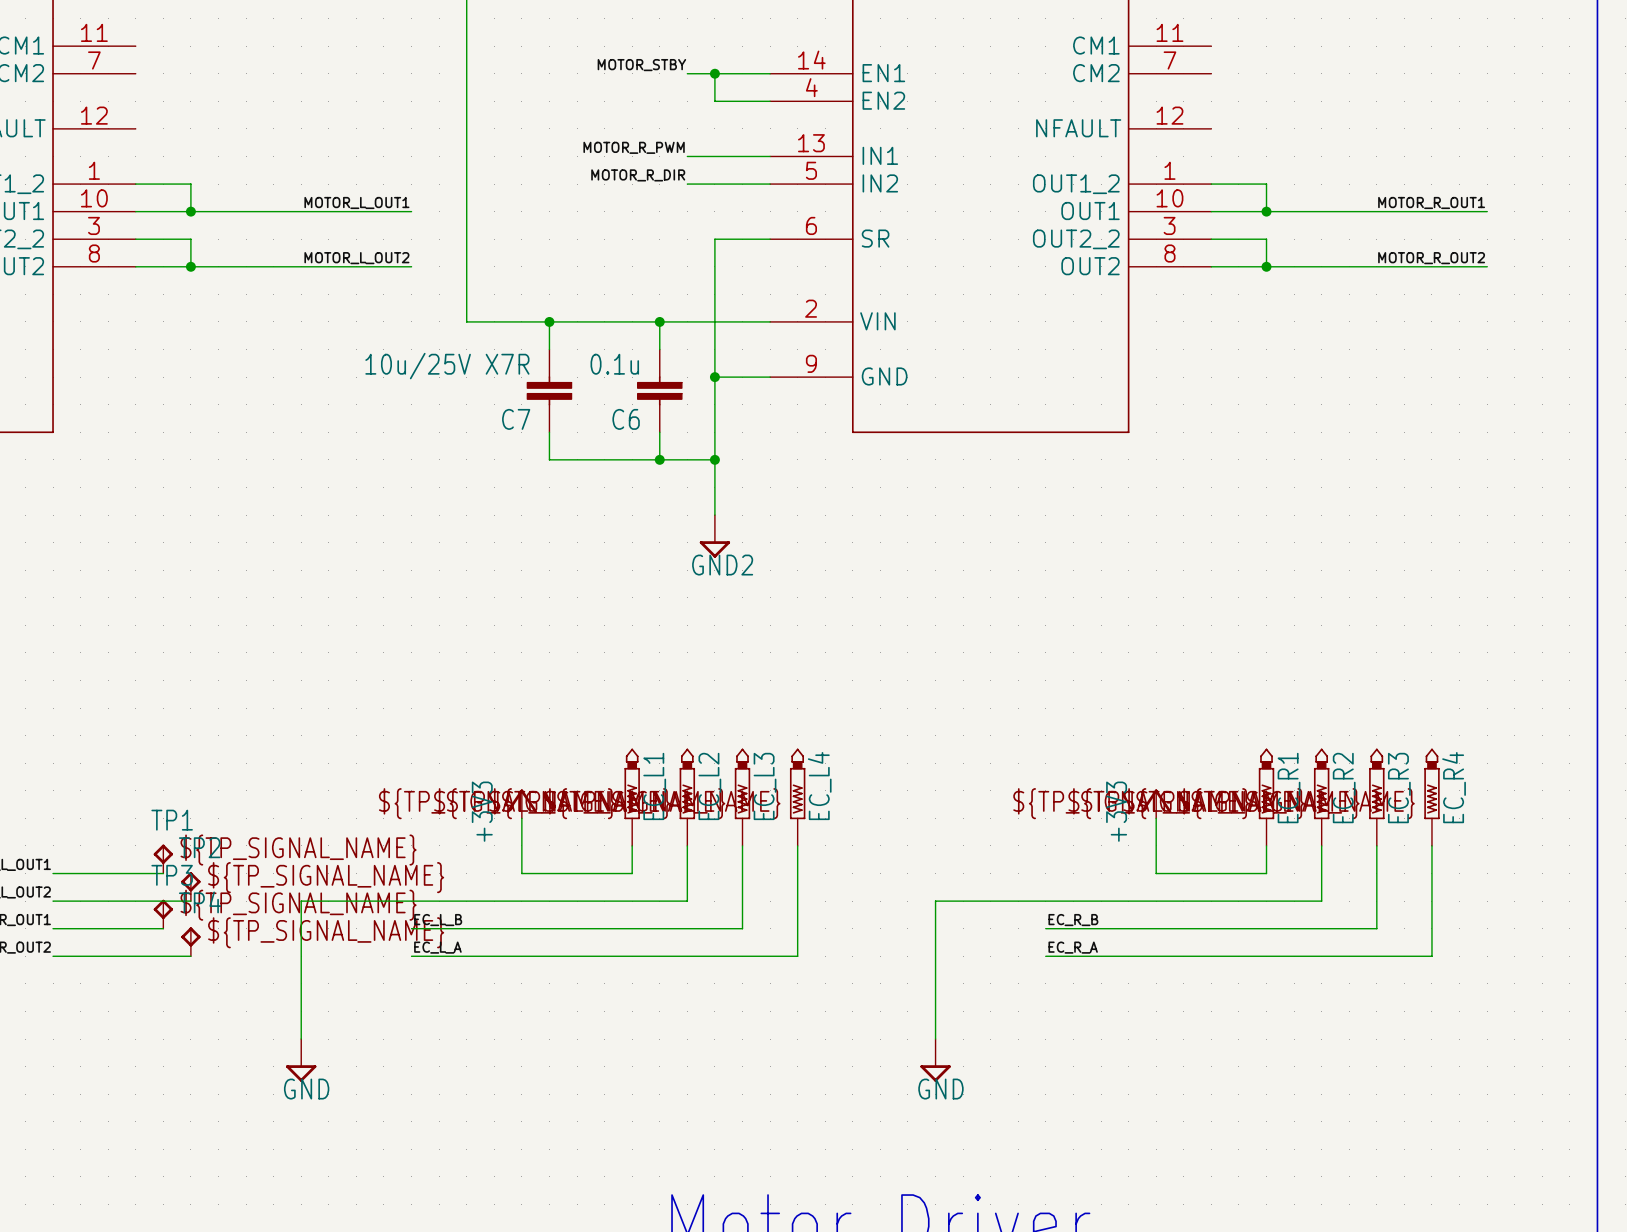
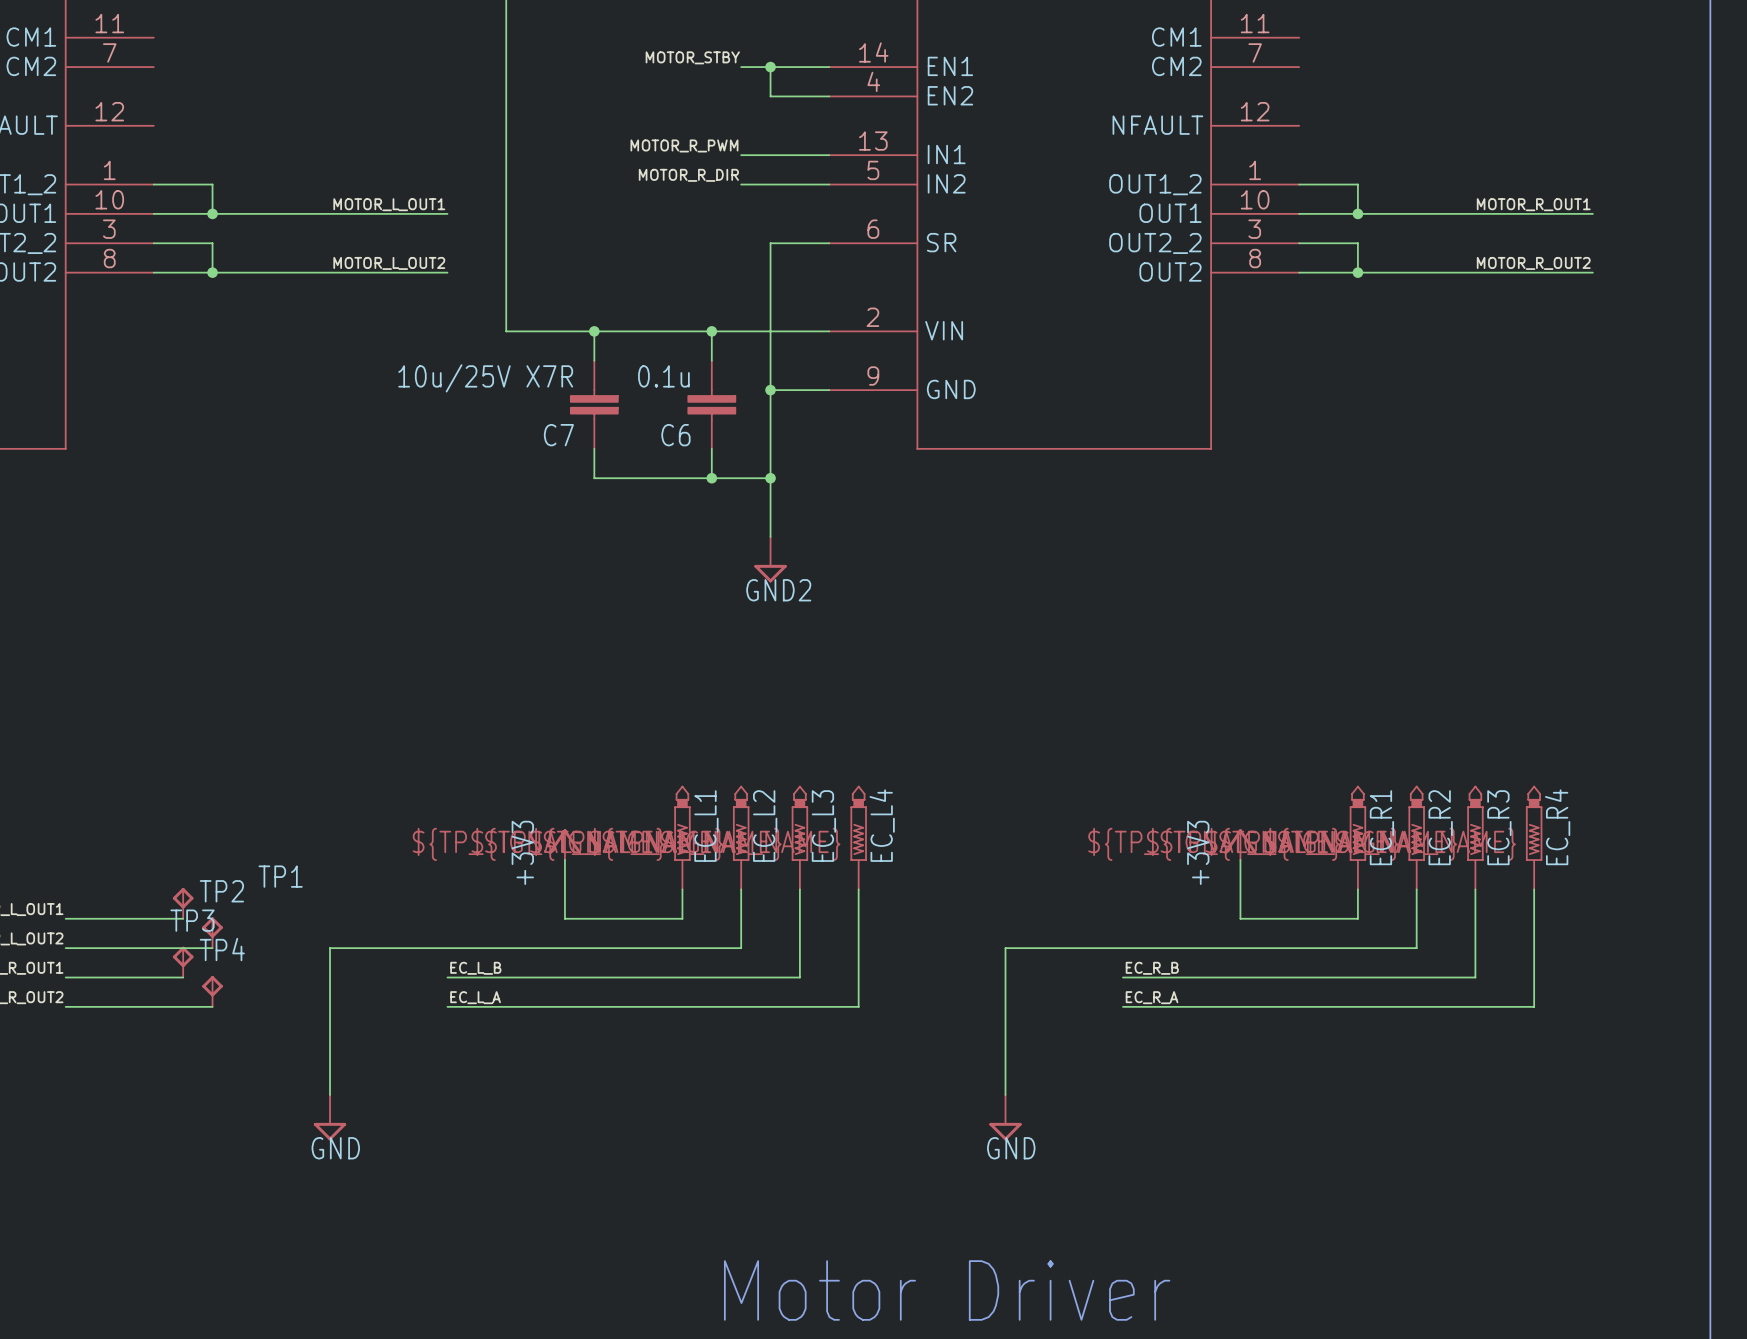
TP1 name position: TP1 (172, 820) -> TP1 (280, 876)
TP1 text: ${TP_SIGNAL_NAME} (298, 850) -> none
TP2 text: ${TP_SIGNAL_NAME} (326, 877) -> none
TP3 text: ${TP_SIGNAL_NAME} (298, 905) -> none
TP4 text: ${TP_SIGNAL_NAME} (326, 932) -> none

